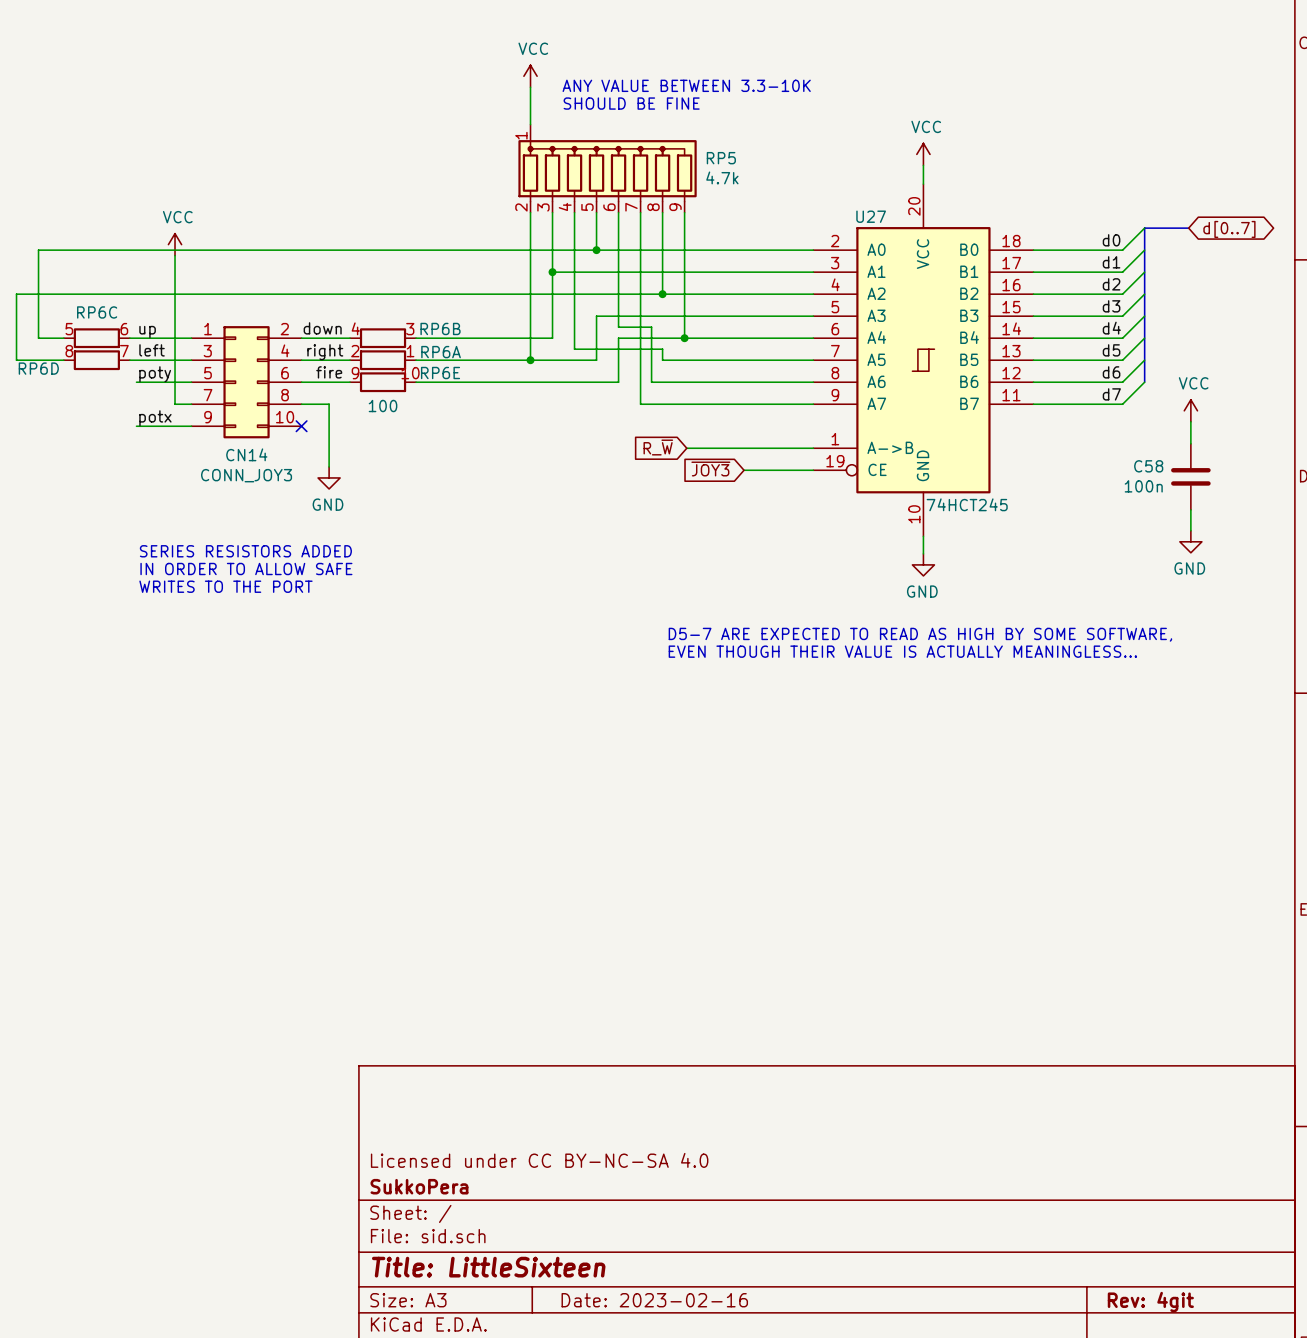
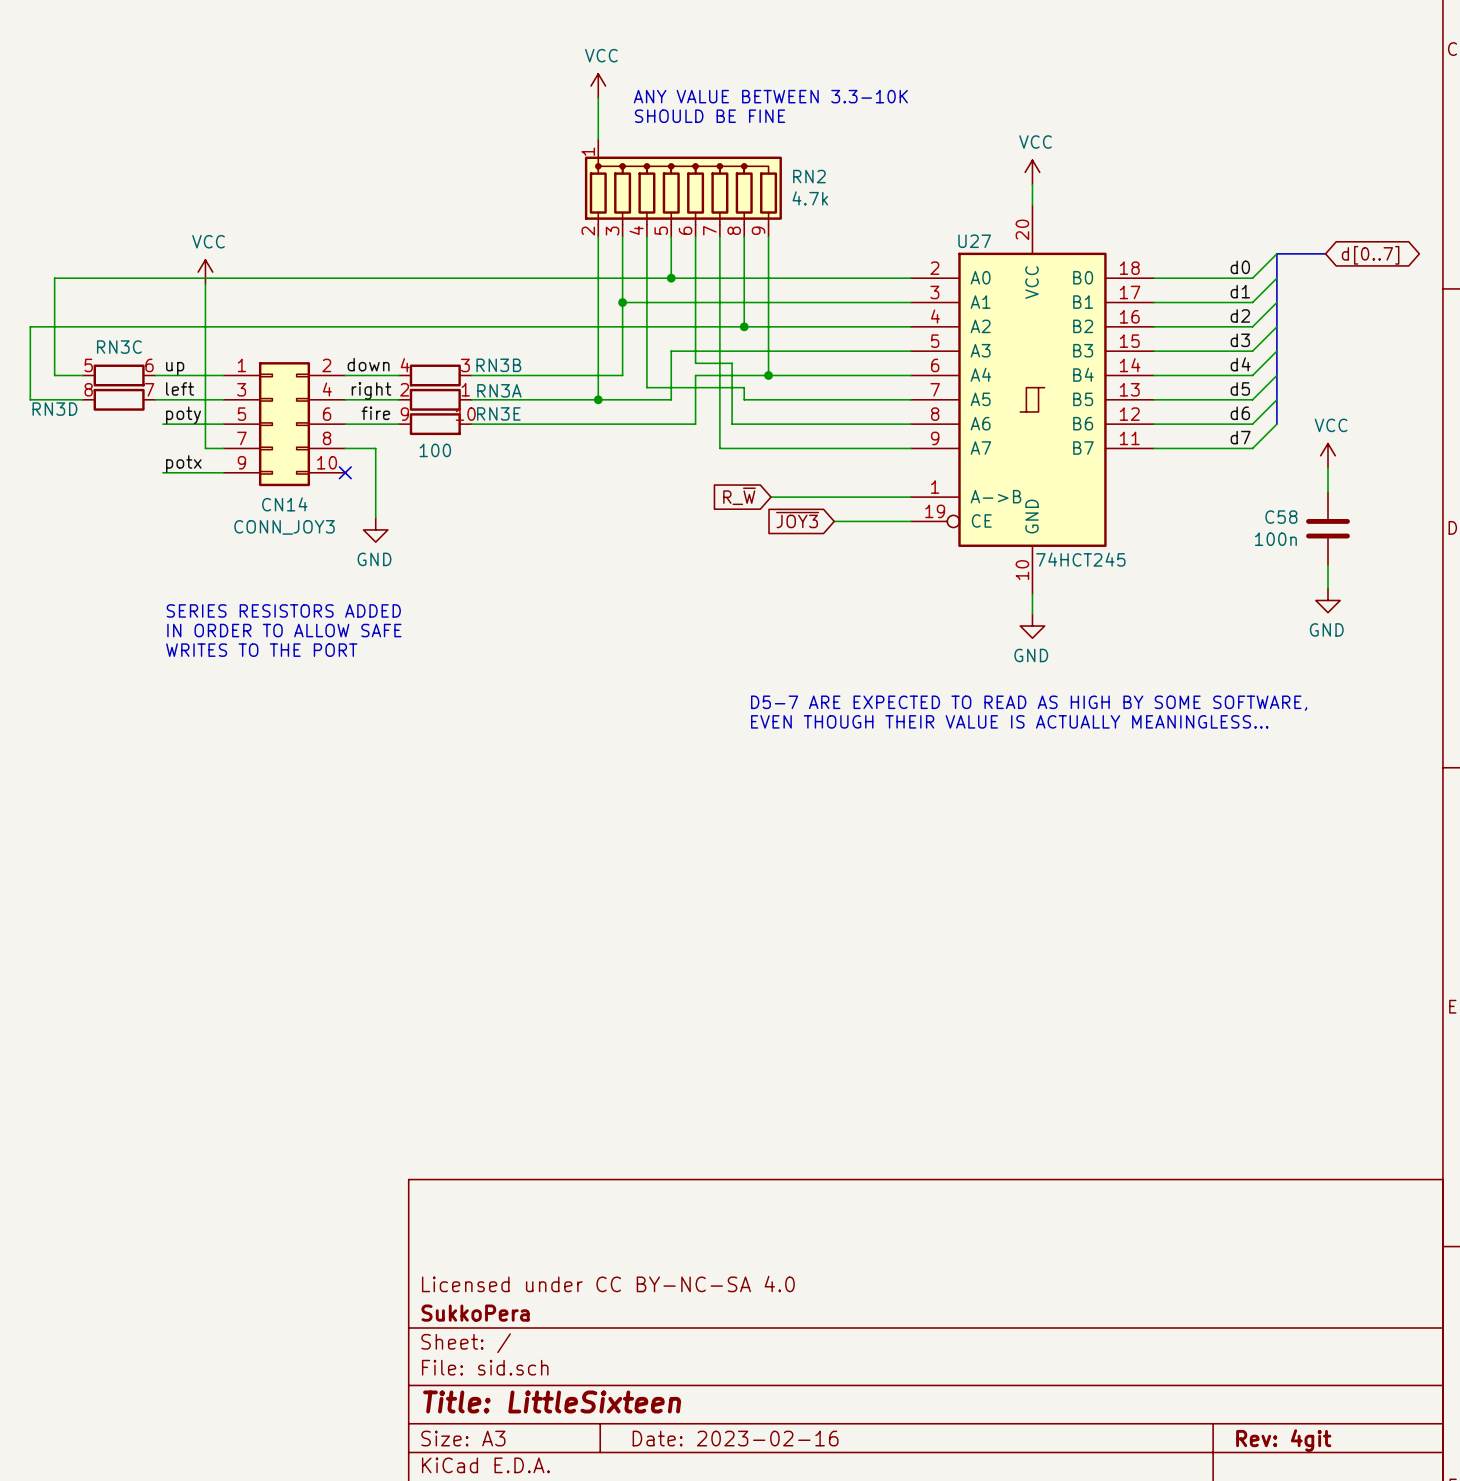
RP5 name: RP5 (721, 158) -> RN2 (809, 176)
RP6C name: RP6C (97, 312) -> RN3C (119, 347)
RP6B name: RP6B (440, 328) -> RN3B (498, 365)
RP6A name: RP6A (441, 352) -> RN3A (499, 390)
RP6D name: RP6D (38, 368) -> RN3D (54, 409)
RP6E name: RP6E (440, 373) -> RN3E (498, 413)

